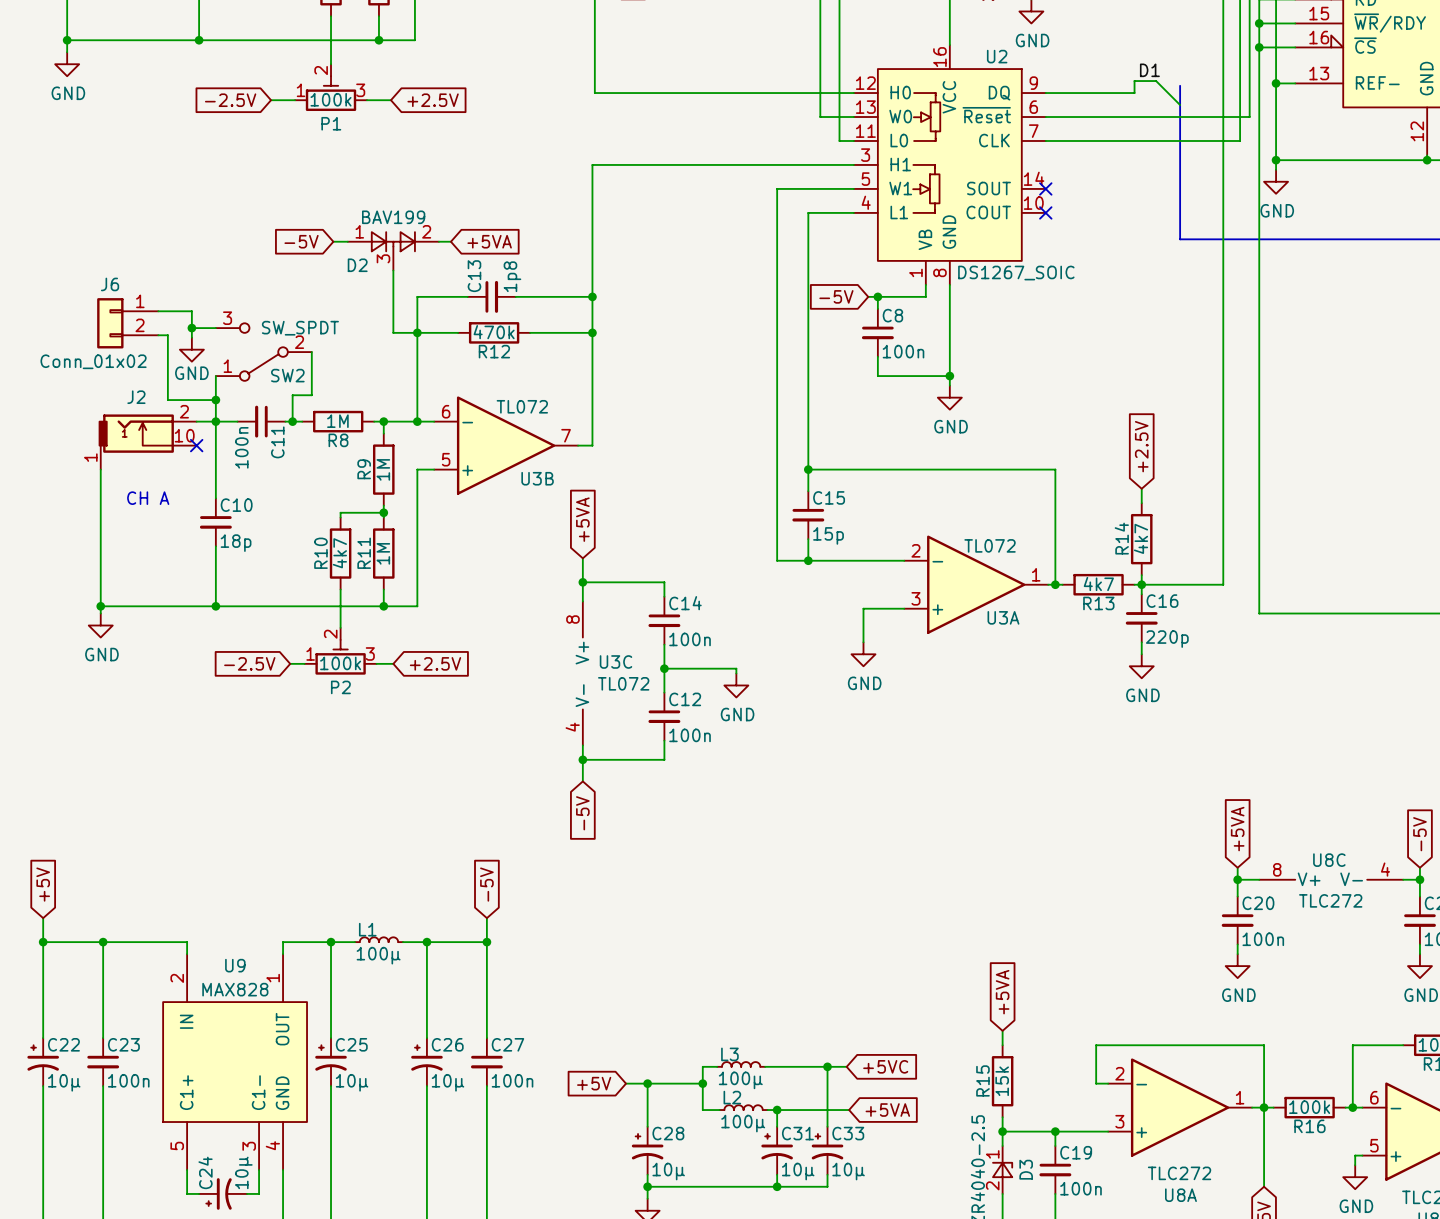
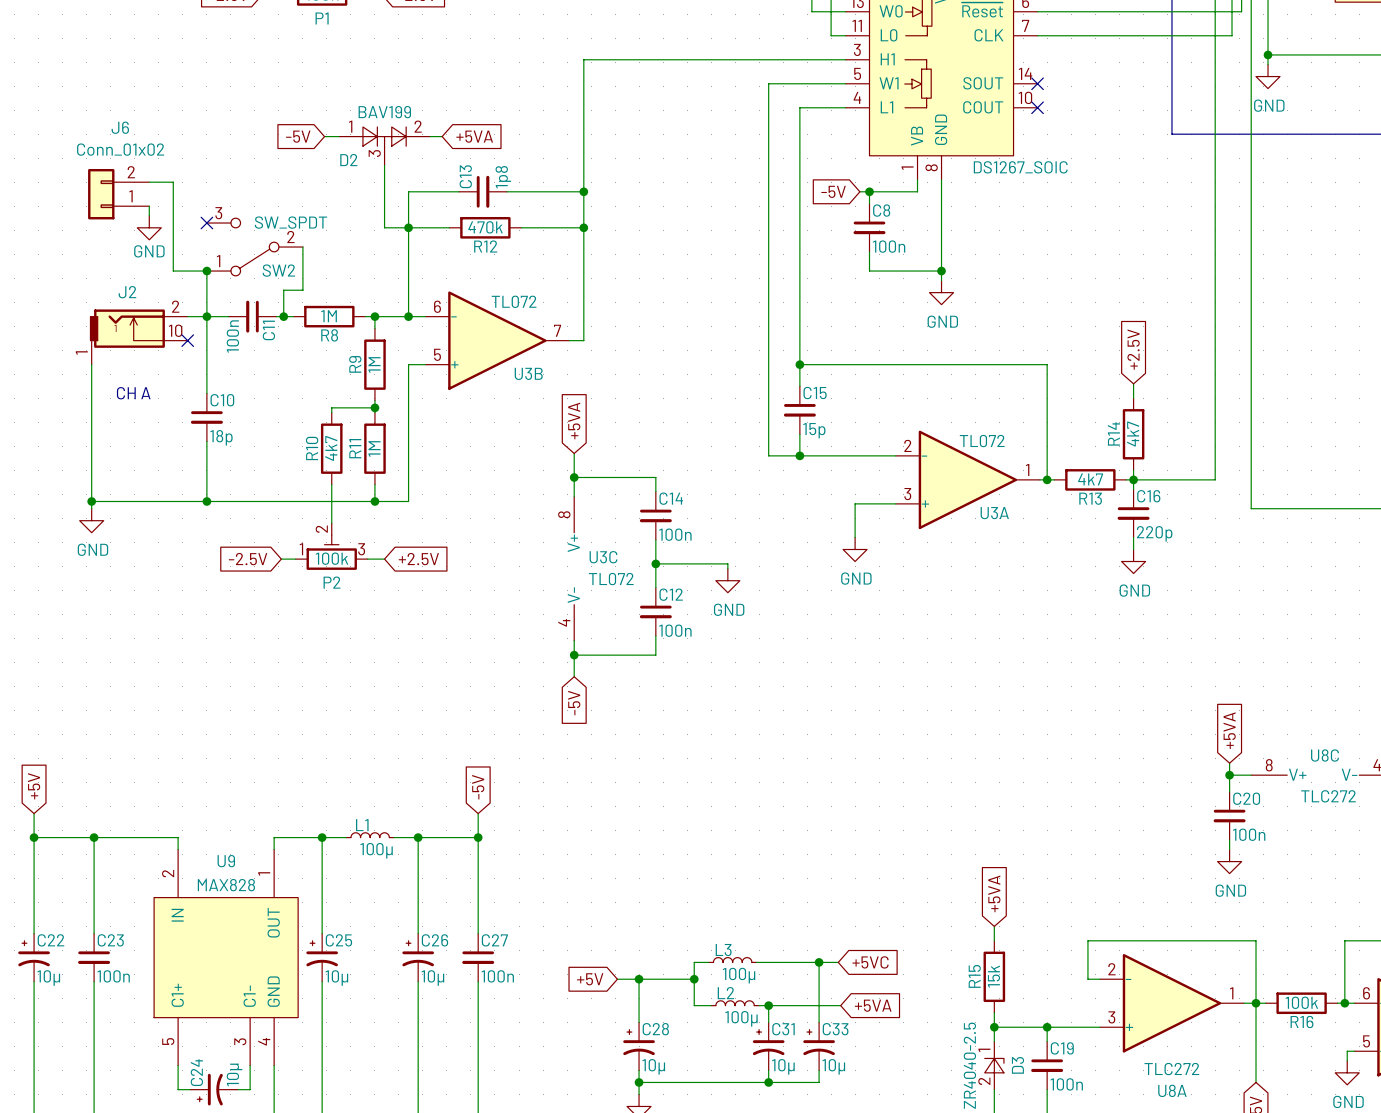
J6 name position: J6 (110, 284) -> J6 (120, 127)
wire: none -> (149, 182) (173, 182) (173, 271) (206, 271)
wire: (158, 311) (191, 311) (191, 337) -> (149, 206) (149, 215)
J6 flip: as is (110, 323) -> up-down (101, 194)
wire: (191, 328) (215, 328) -> none
junction: (191, 328) -> none
no-connect mark: none -> (206, 223)
wire: (158, 335) (167, 335) (167, 400) (215, 400) -> none
power symbol position: GND (191, 349) -> GND (149, 227)
J6 value position: Conn_01x02 (93, 361) -> Conn_01x02 (120, 149)
junction position: (215, 400) -> (206, 271)

